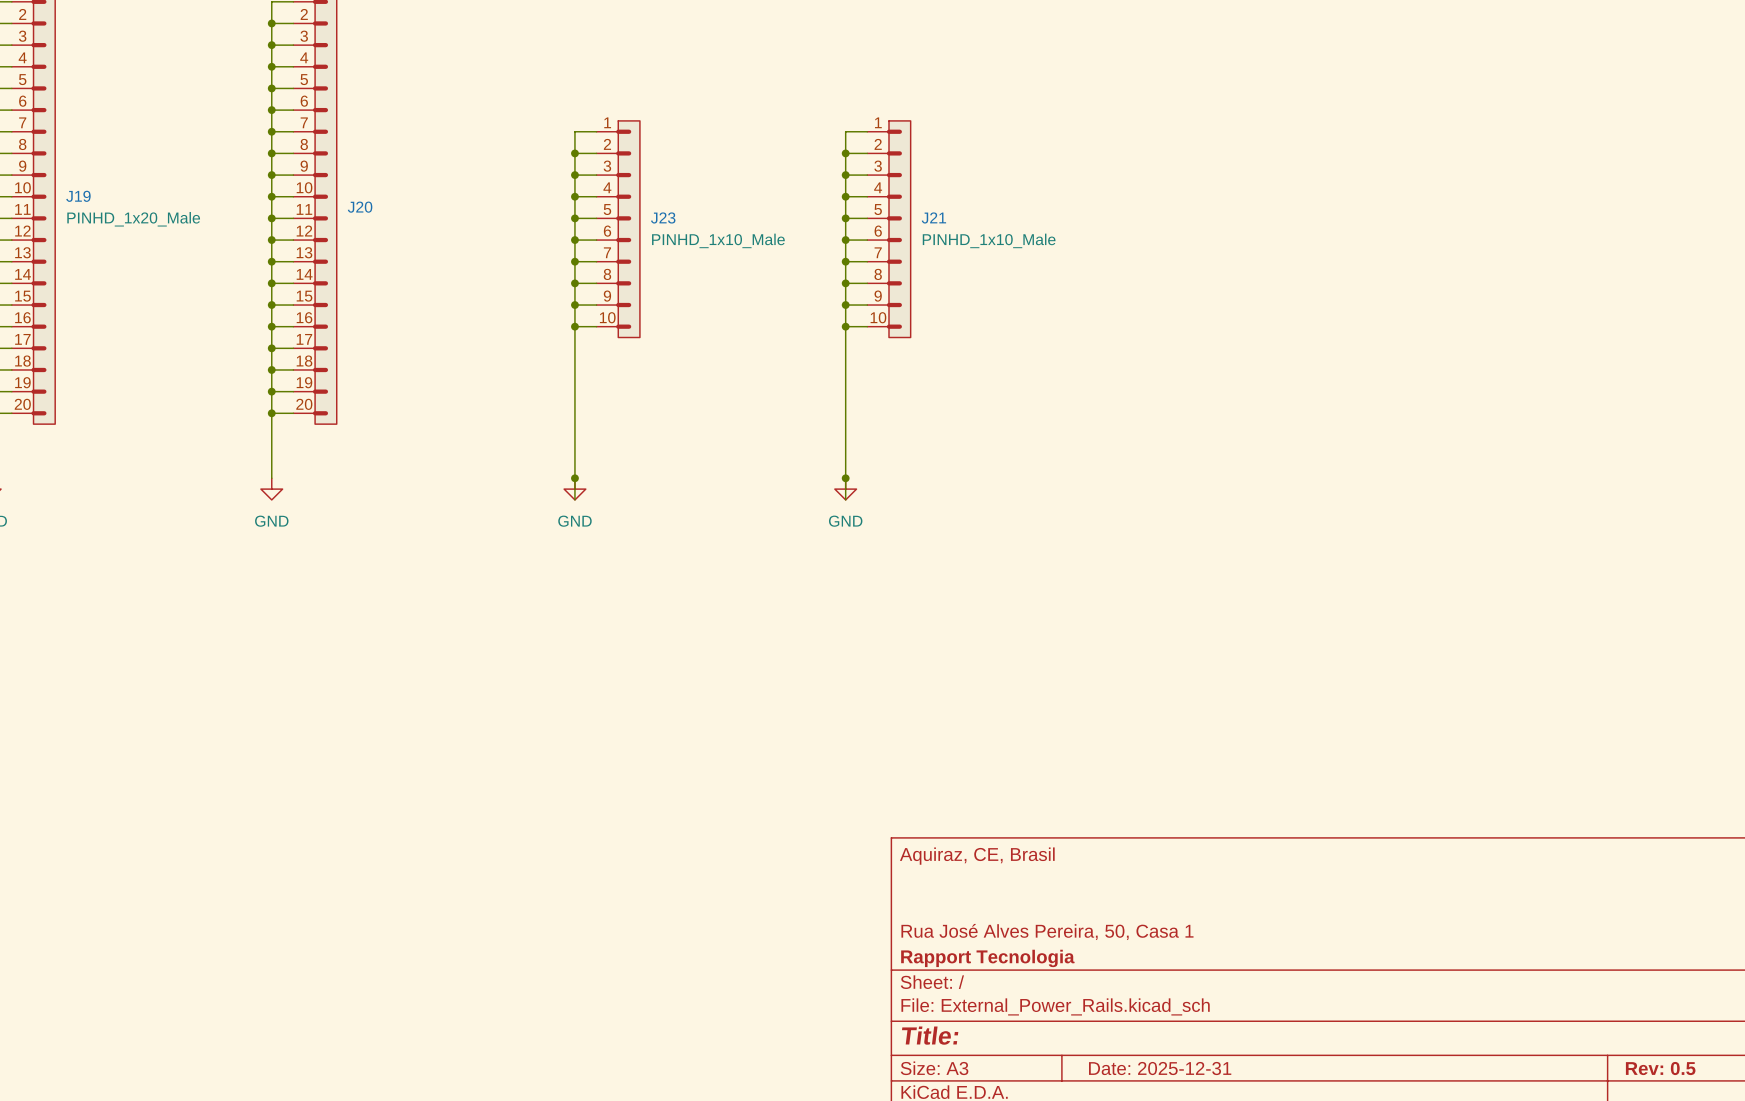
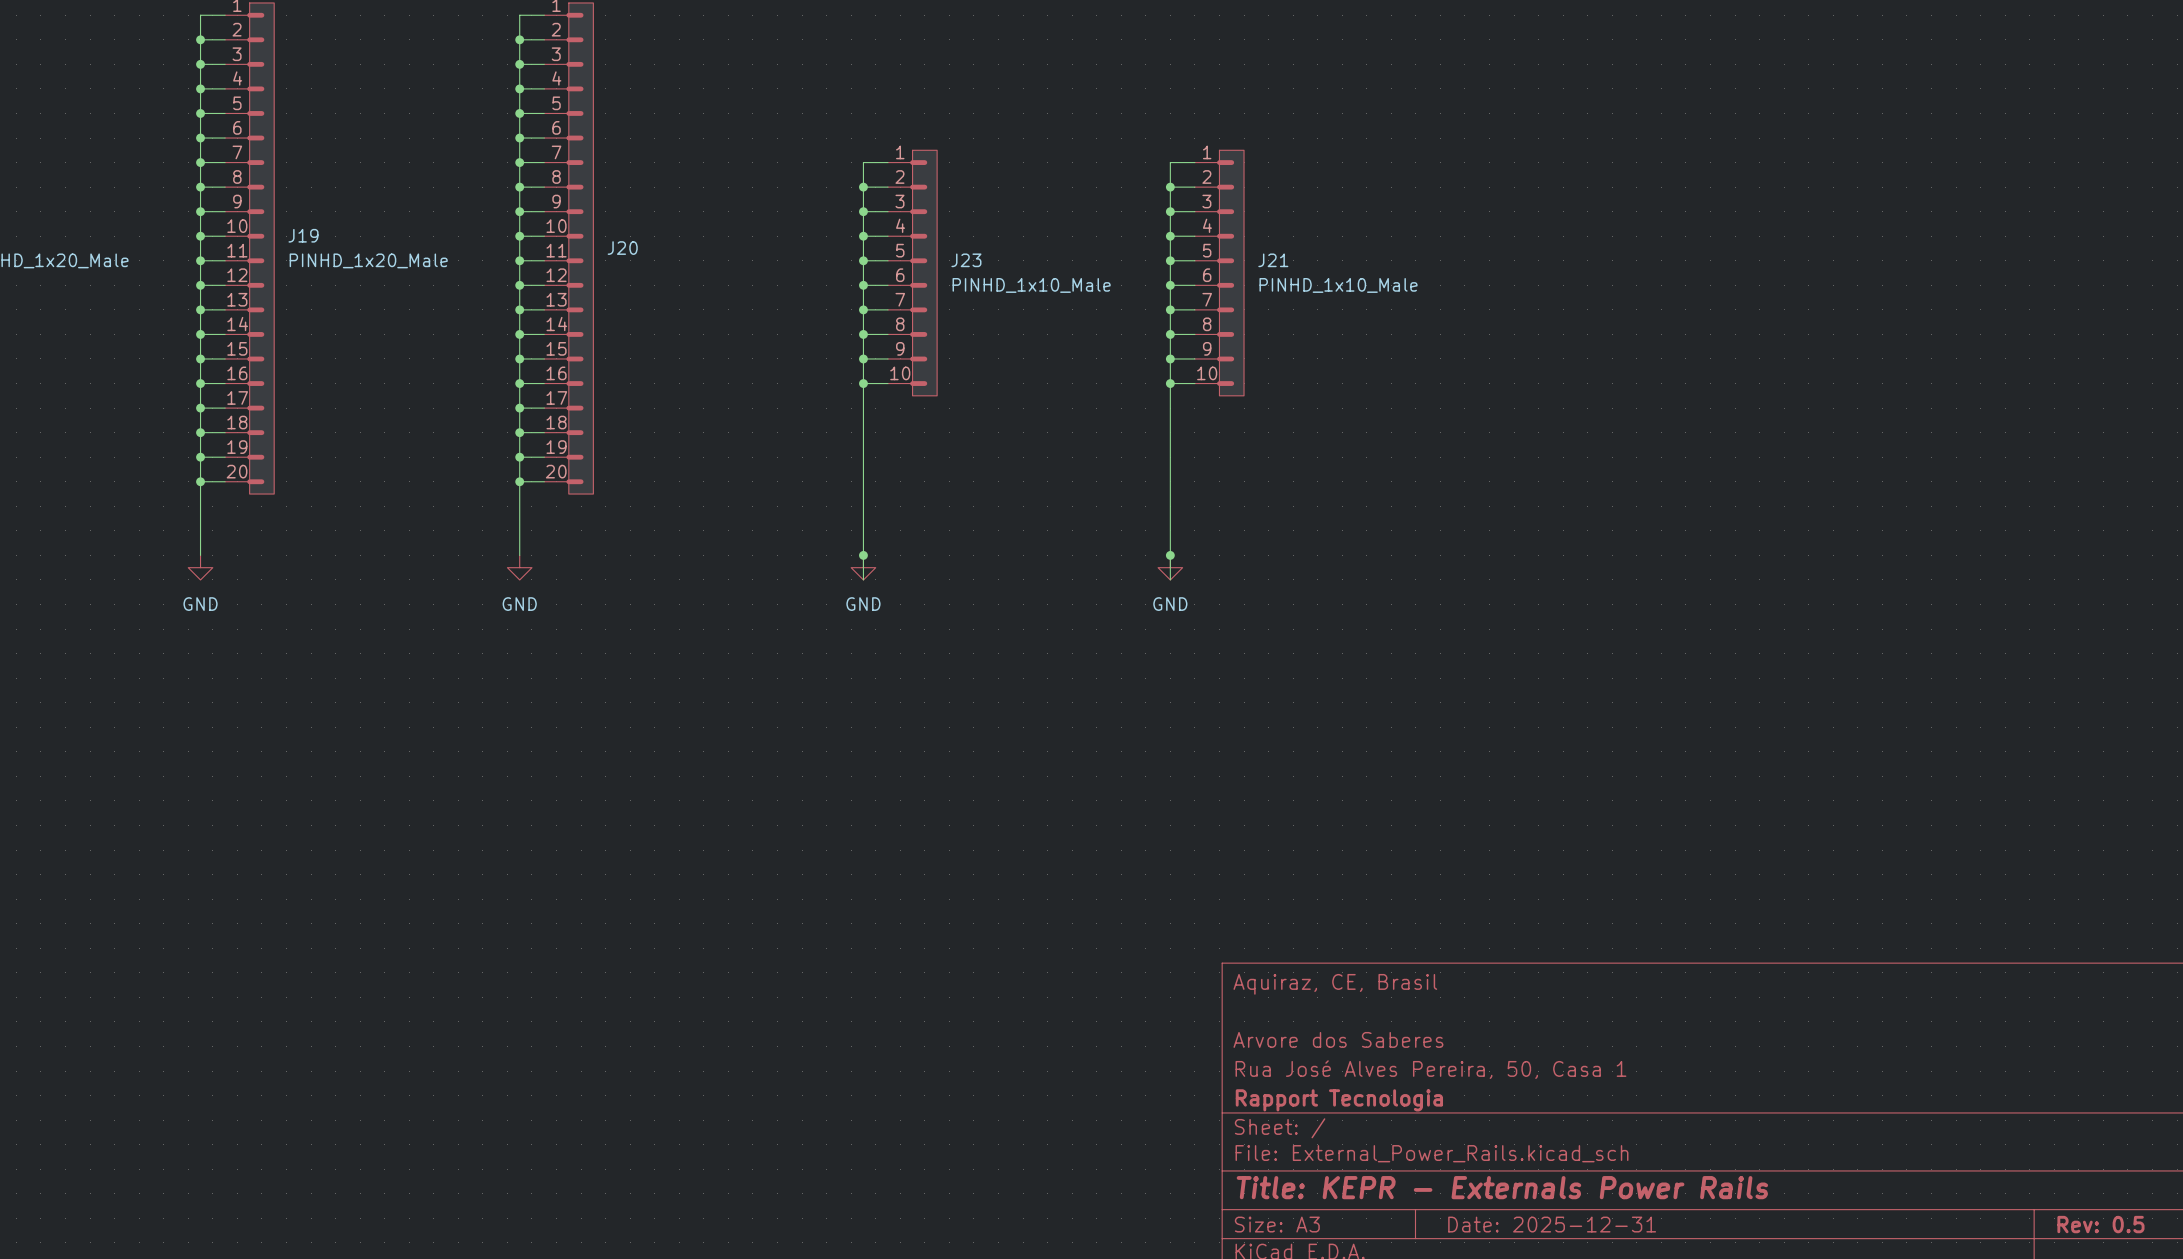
title block: none -> Arvore dos Saberes (1338, 1039)
title block: Title: (930, 1035) -> Title: KEPR - Externals Power Rails (1502, 1187)

